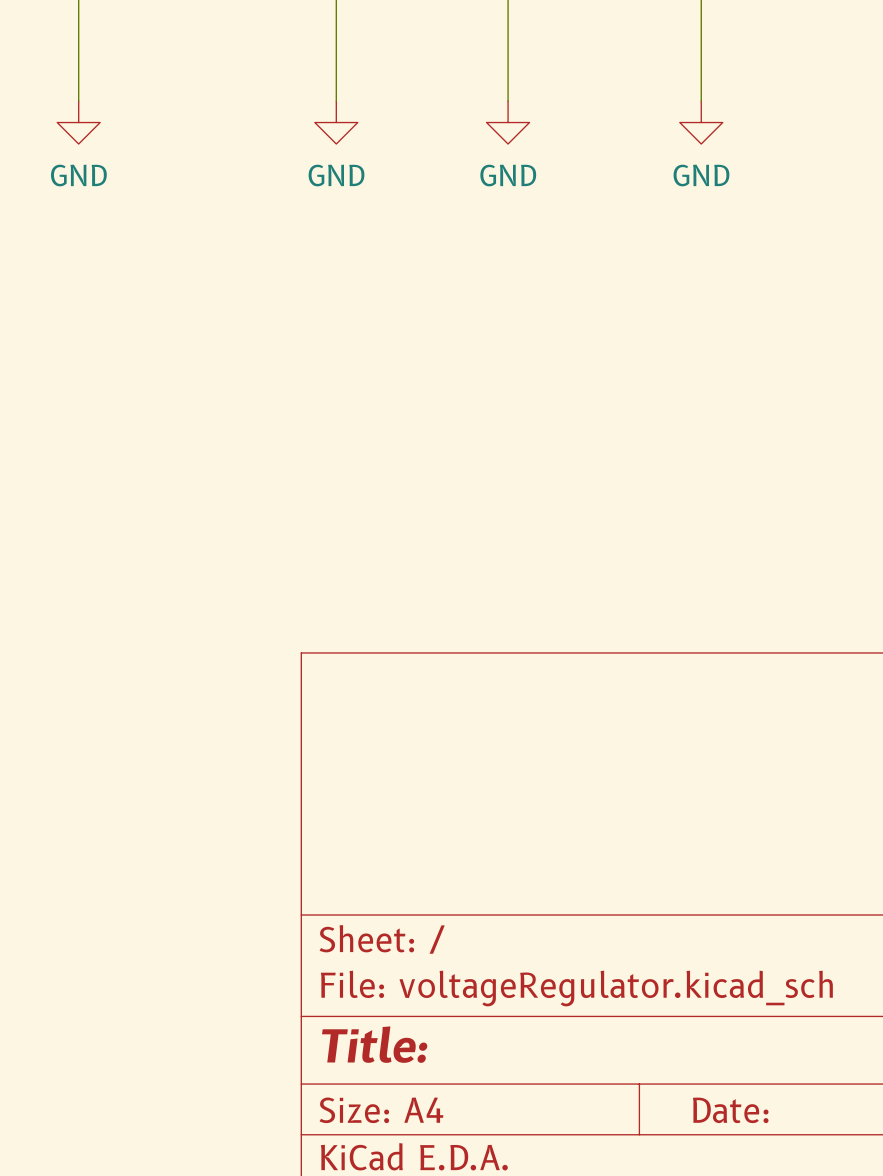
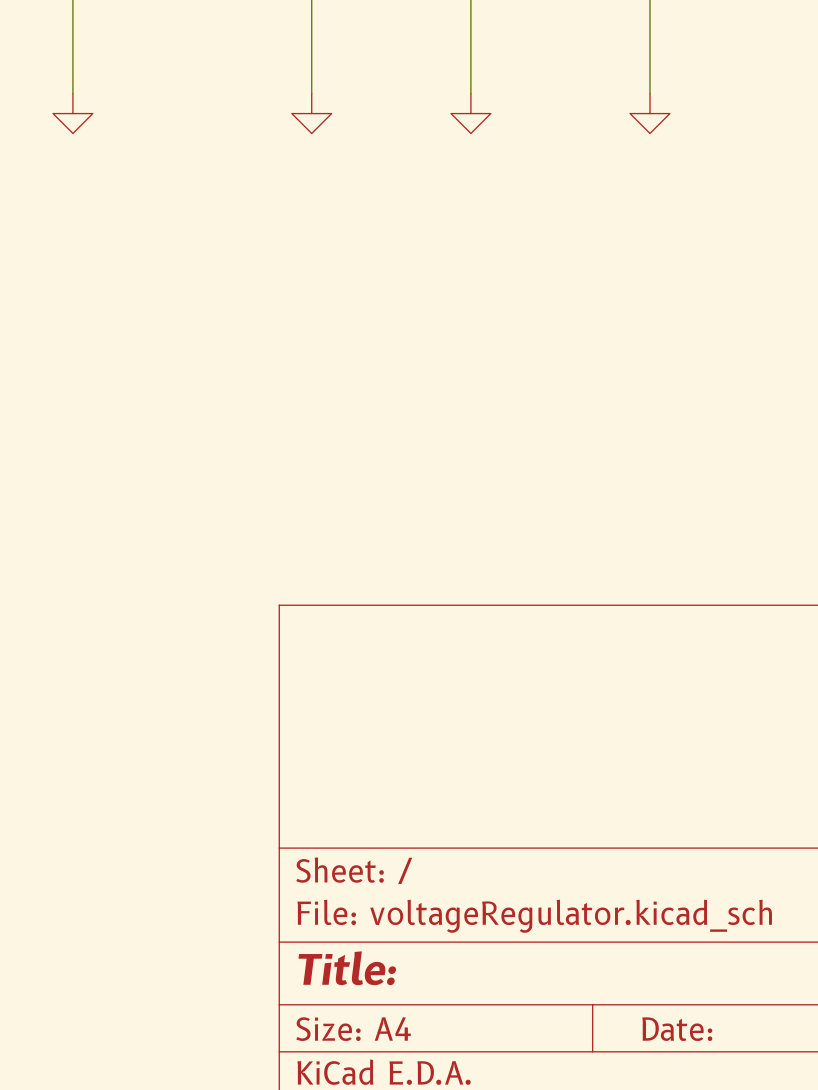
power symbol text: GND (78, 175) -> none
power symbol text: GND (336, 175) -> none
power symbol text: GND (508, 175) -> none
power symbol text: GND (701, 175) -> none

